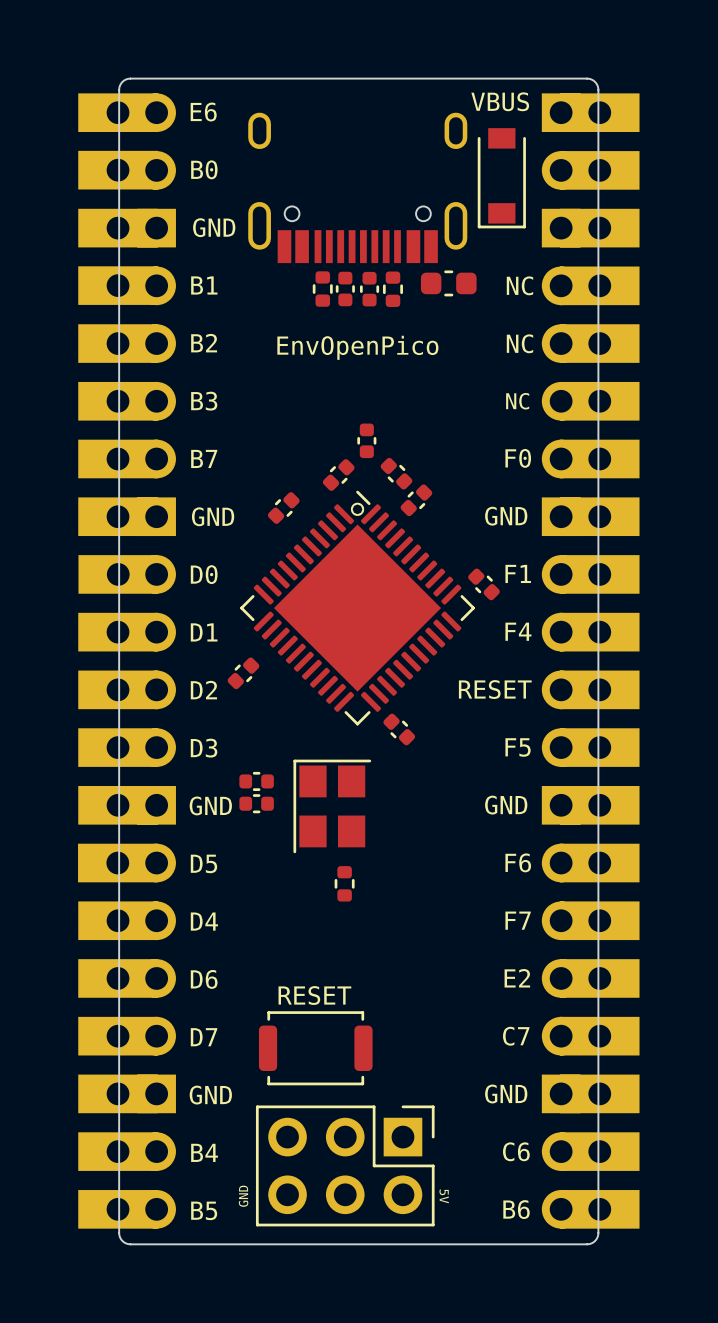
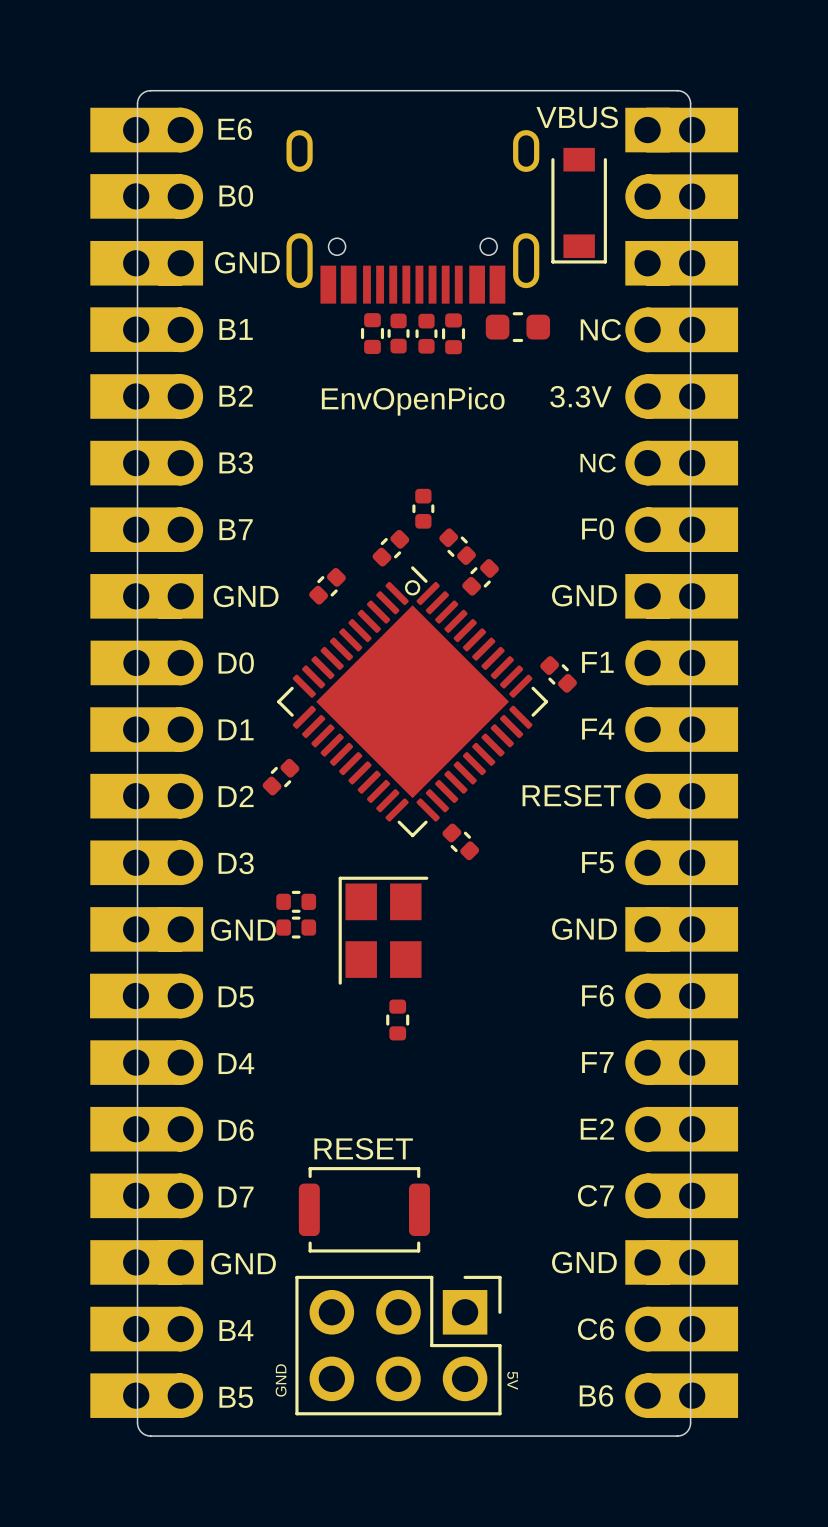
text: NC (519, 343) -> 3.3V (580, 396)

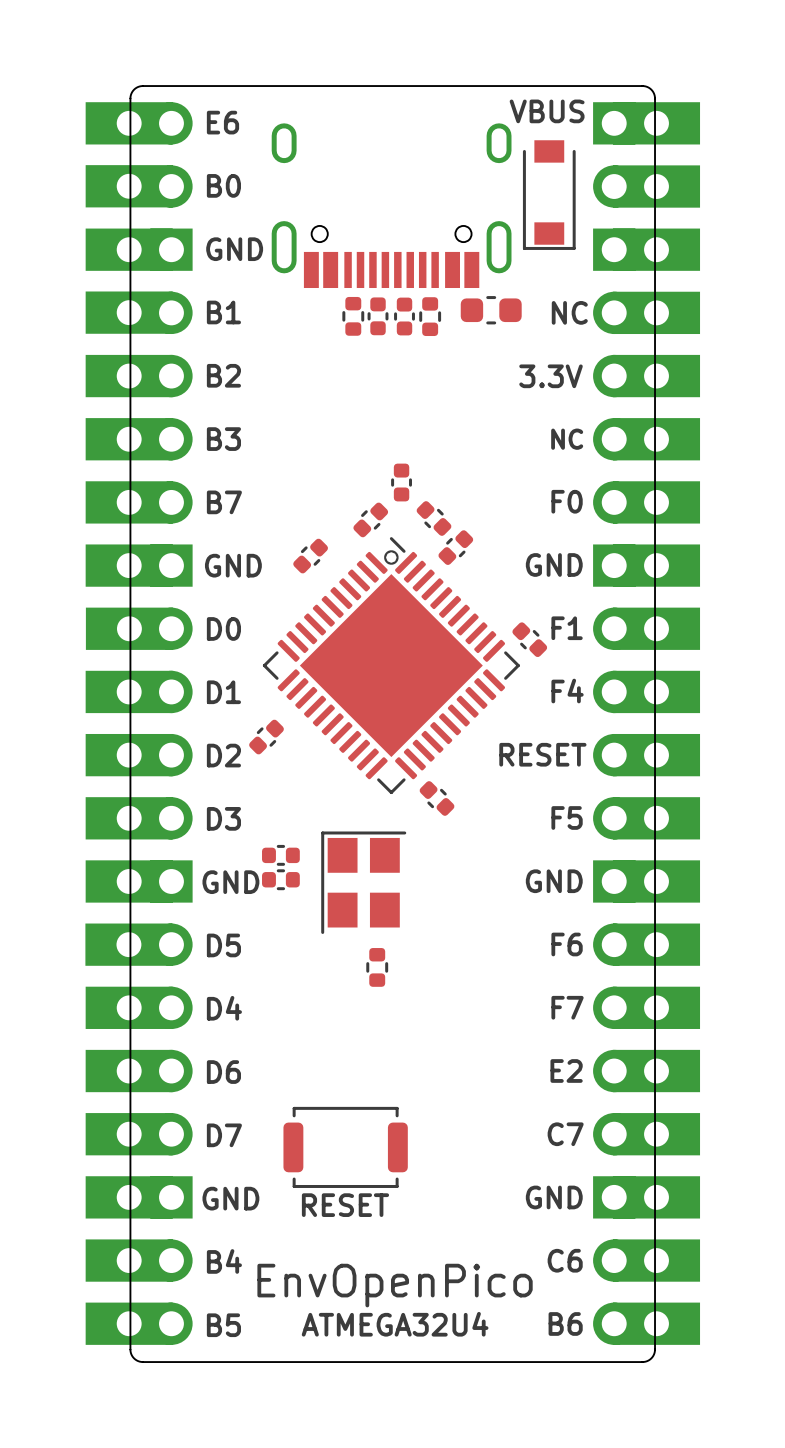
text: EnvOpenPico (413, 401) -> none
text position: RESET (363, 1148) -> RESET (345, 1205)
part: (398, 1345) -> none
text: none -> EnvOpenPico (395, 1285)
text: GND (281, 1380) -> none
text: 5V (512, 1380) -> none
text: none -> ATMEGA32U4 (395, 1324)

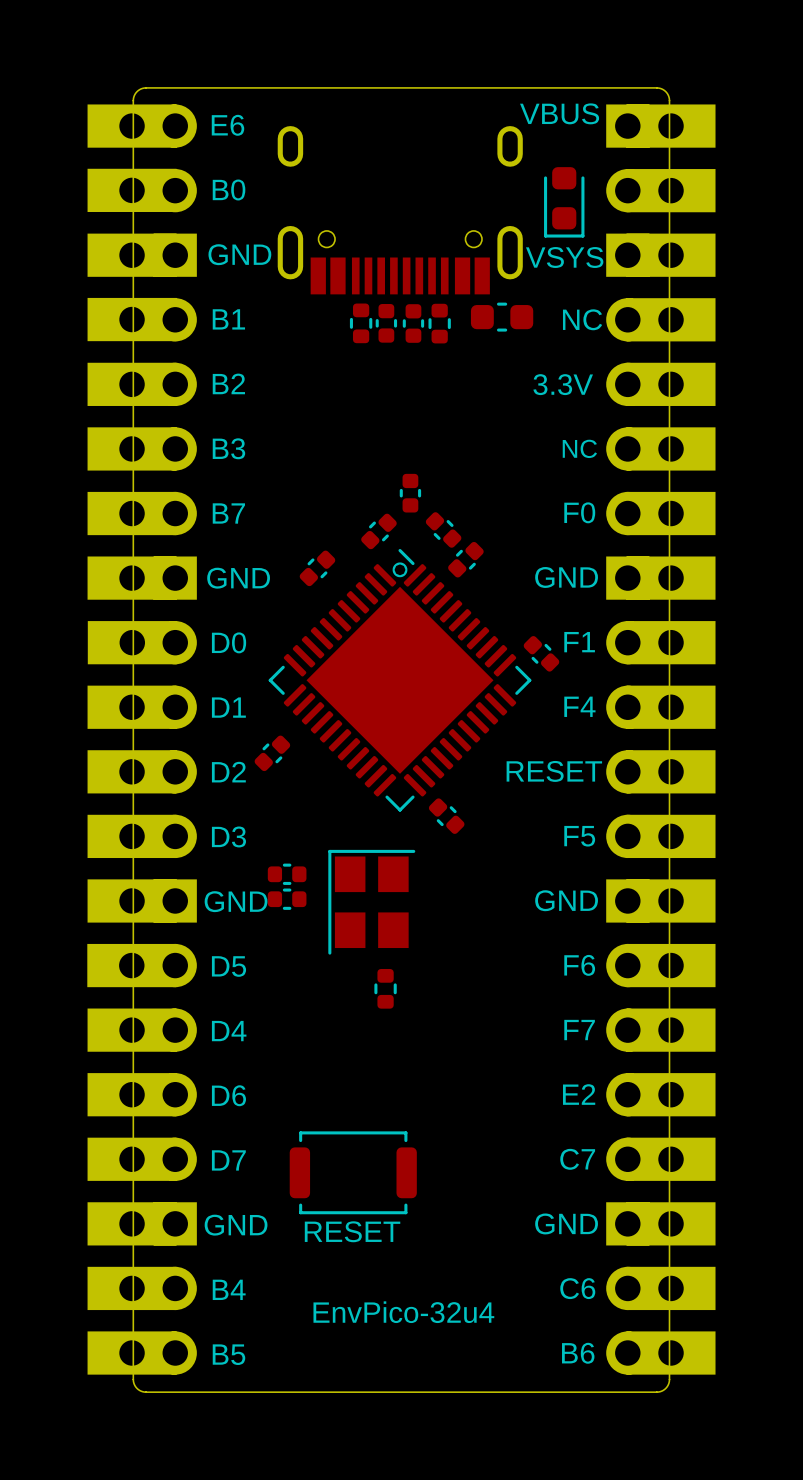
part footprint: [522, 140, 576, 250] -> [544, 167, 585, 238]
text: none -> VSYS (564, 257)
text: EnvOpenPico (395, 1285) -> EnvPico-32u4 (403, 1312)
text: ATMEGA32U4 (395, 1324) -> none

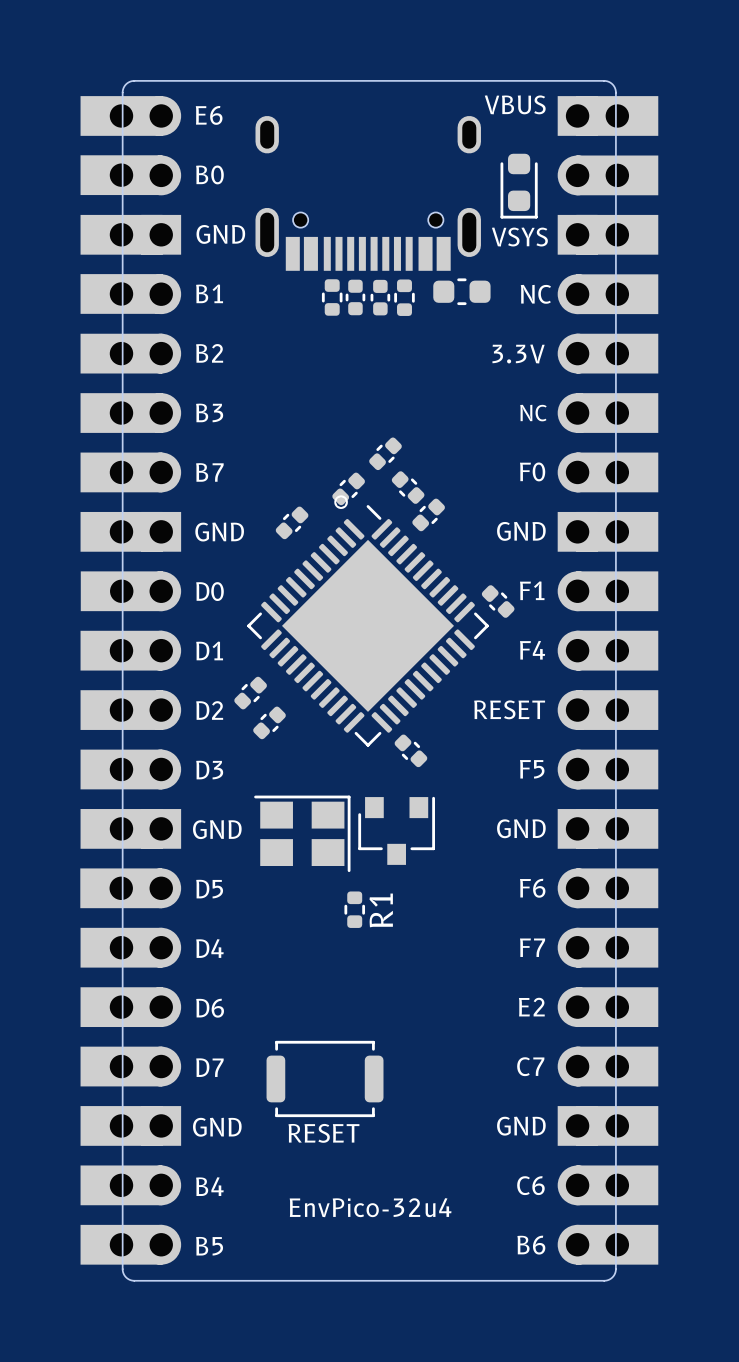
part rotation: 0° (410, 493) -> 45° clockwise (385, 453)
drawing position: (400, 569) -> (341, 502)
part: none -> (269, 722)
part: (287, 874) -> none
part: (287, 899) -> none
part: (371, 902) -> none
part: none -> (396, 830)
part: none -> (302, 833)
R1 name: none -> R1 (381, 910)

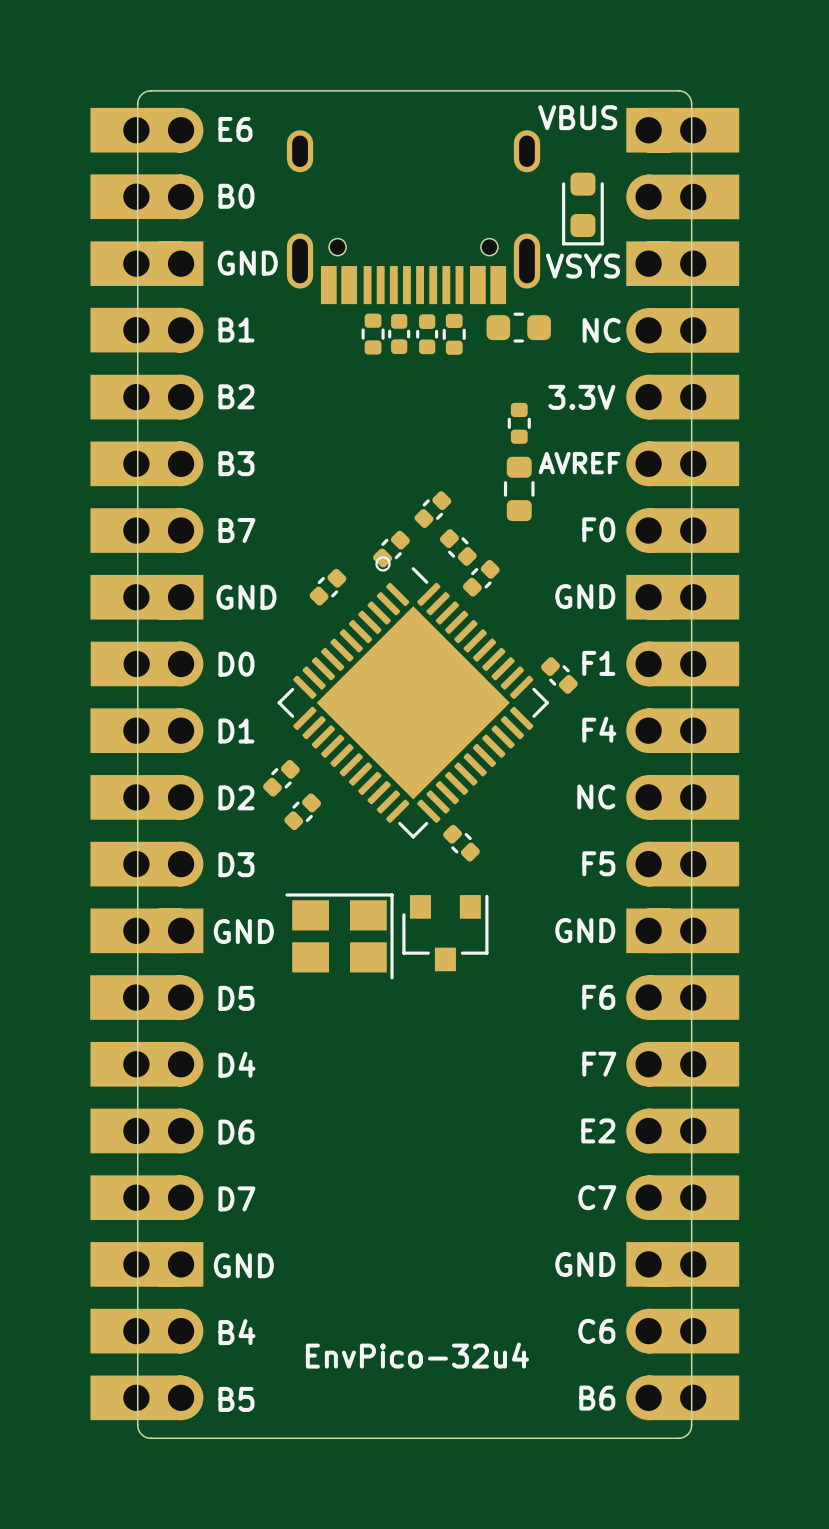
part: none -> (519, 423)
text: NC (533, 413) -> AVREF (579, 463)
part: none -> (519, 488)
text: RESET (509, 709) -> NC (596, 796)
R1: (354, 909) -> none
part: (325, 1078) -> none
text: RESET (323, 1133) -> none

